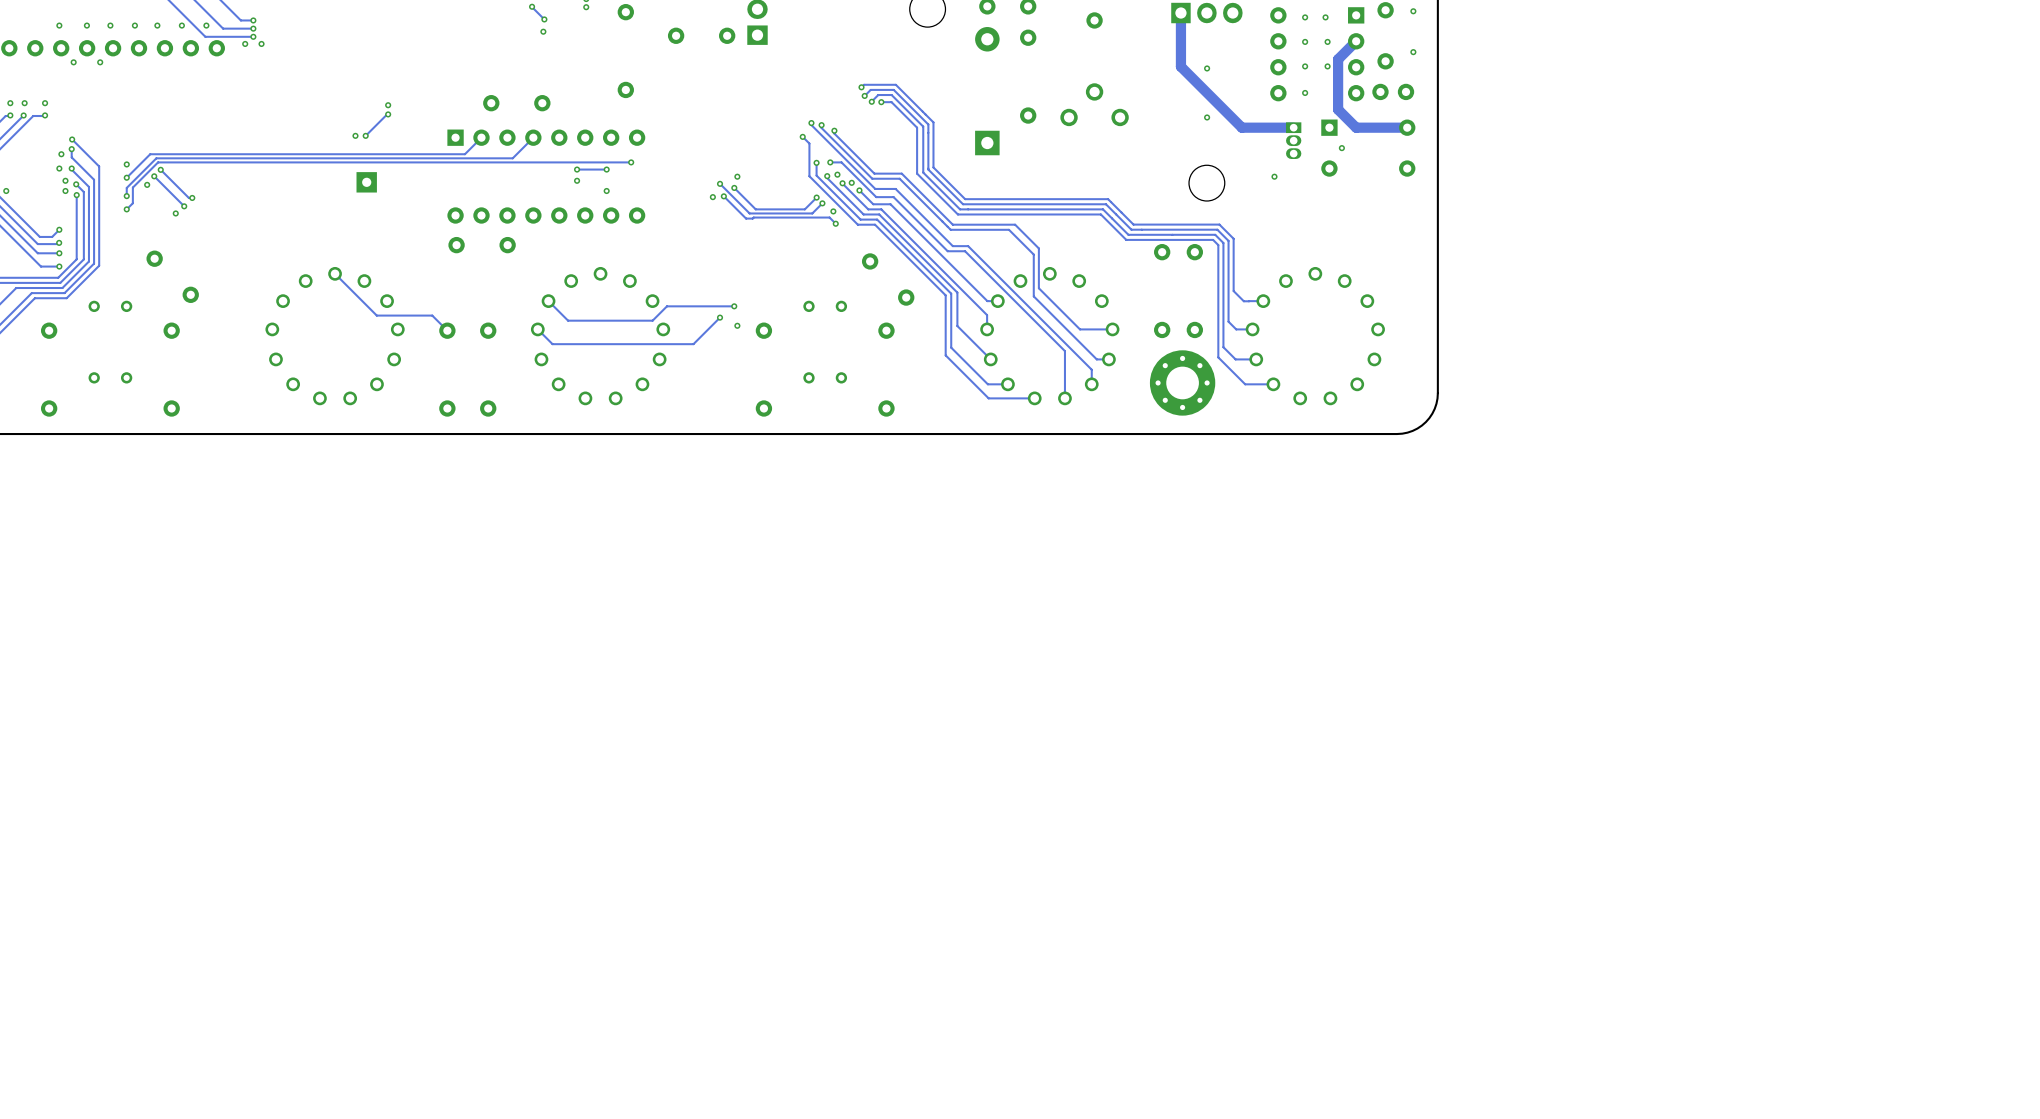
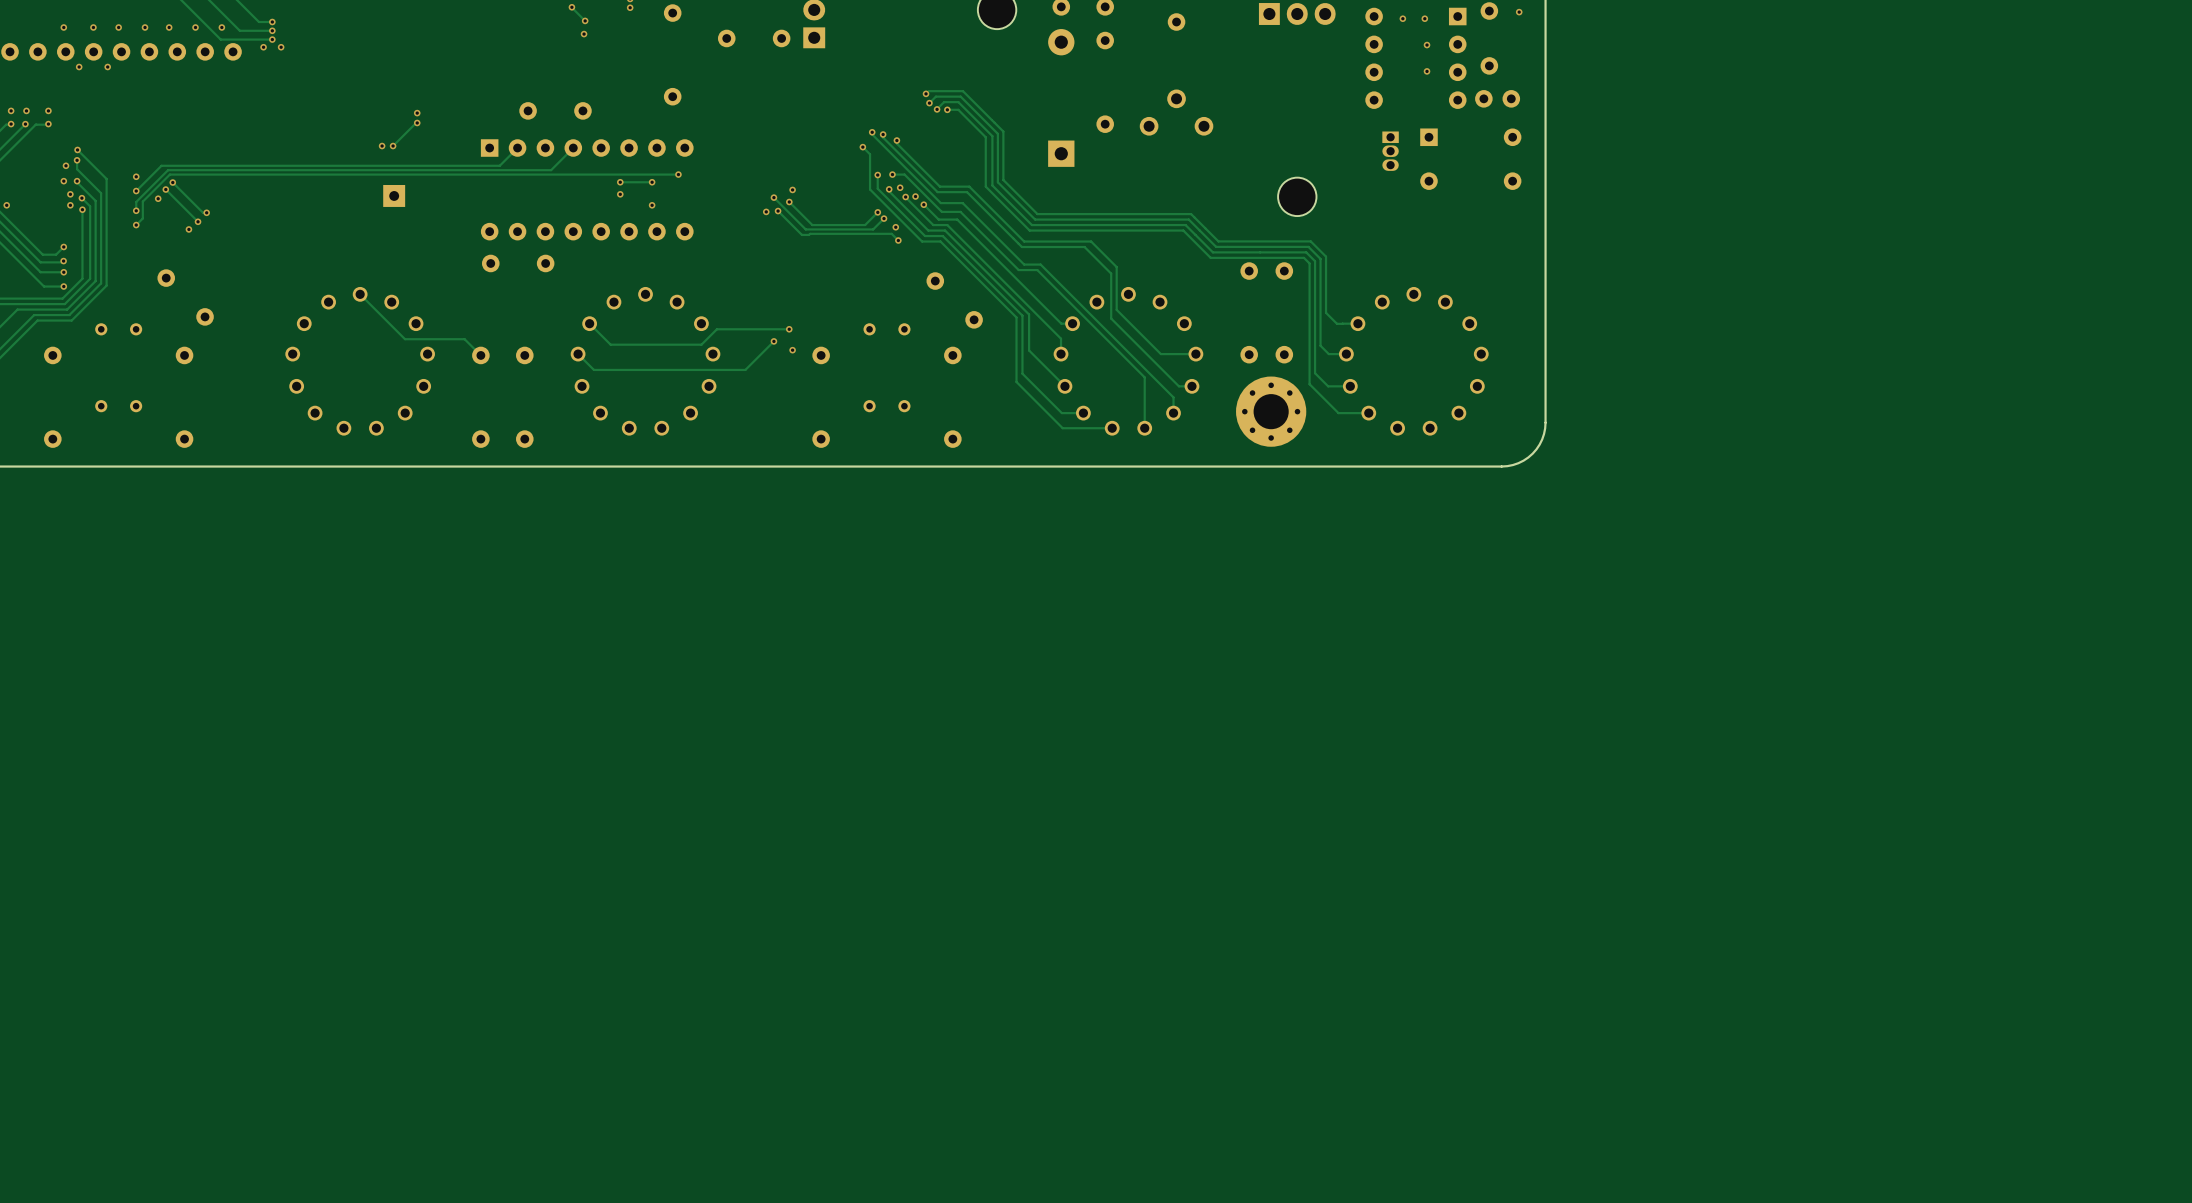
track: (1180, 13) (1180, 66) (1241, 127) (1293, 127) -> none
via: (1305, 41) -> none
track: (1356, 41) (1338, 59) (1338, 109) (1356, 127) (1407, 127) -> none
via: (1413, 52) -> none
via: (1305, 66) -> none
via: (1207, 68) -> none
via: (1305, 92) -> none
via: (1207, 117) -> none
via: (1341, 148) -> none
via: (1274, 176) -> none

